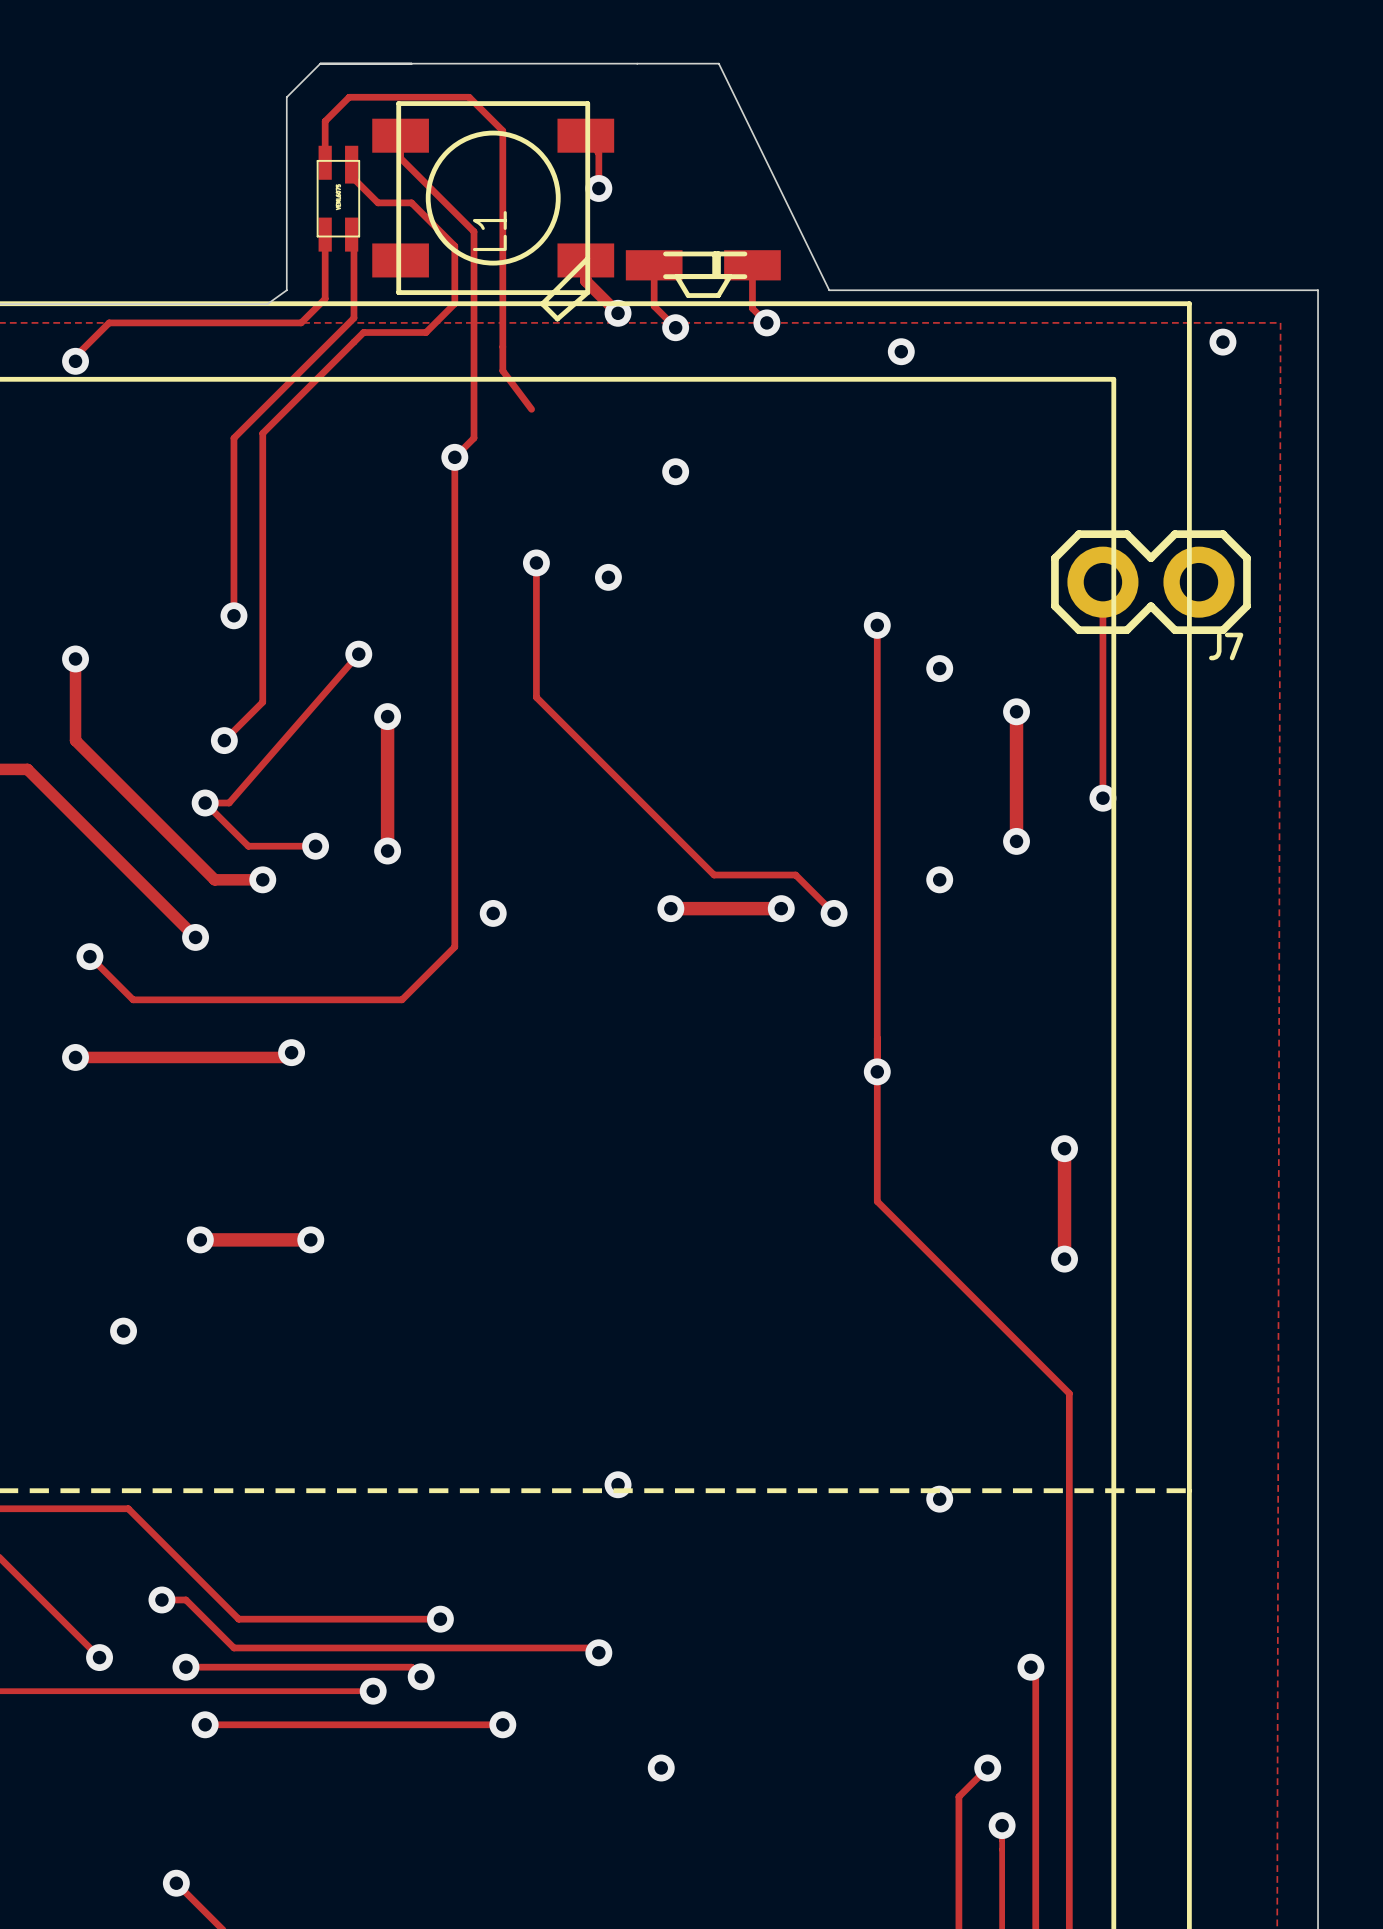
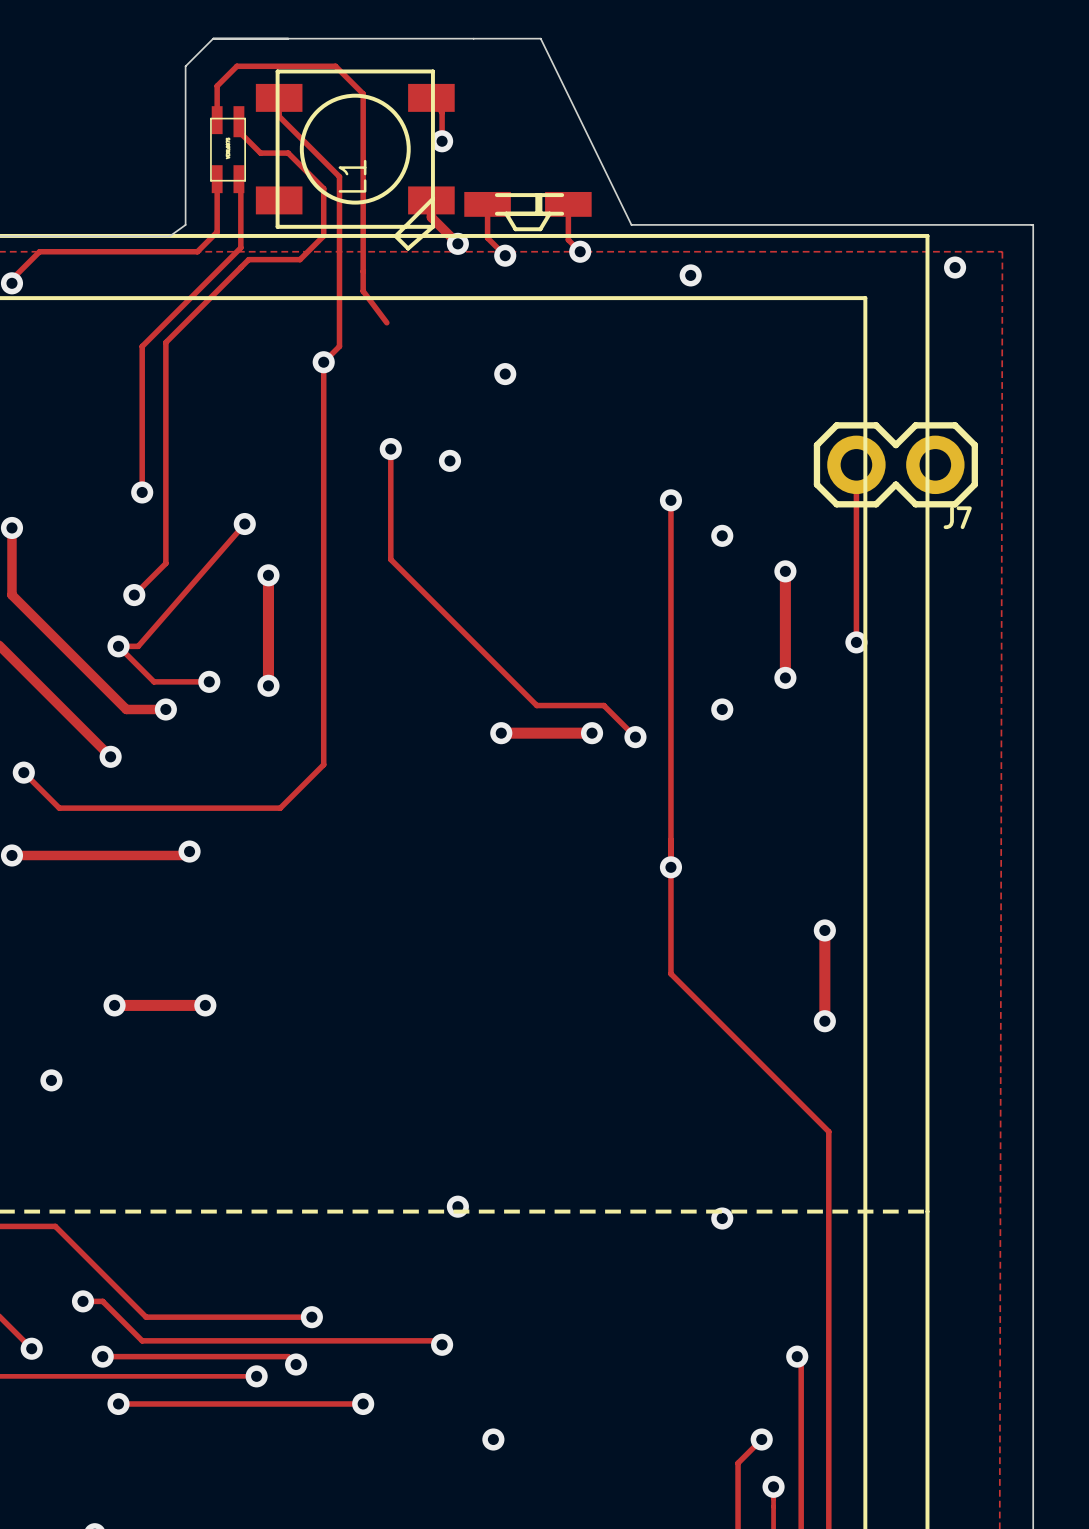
via: (493, 913) -> none

